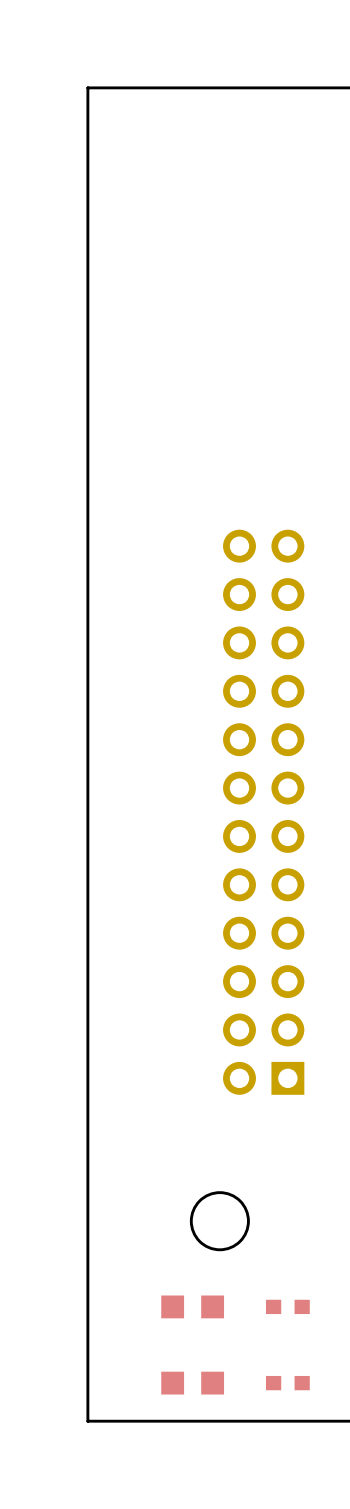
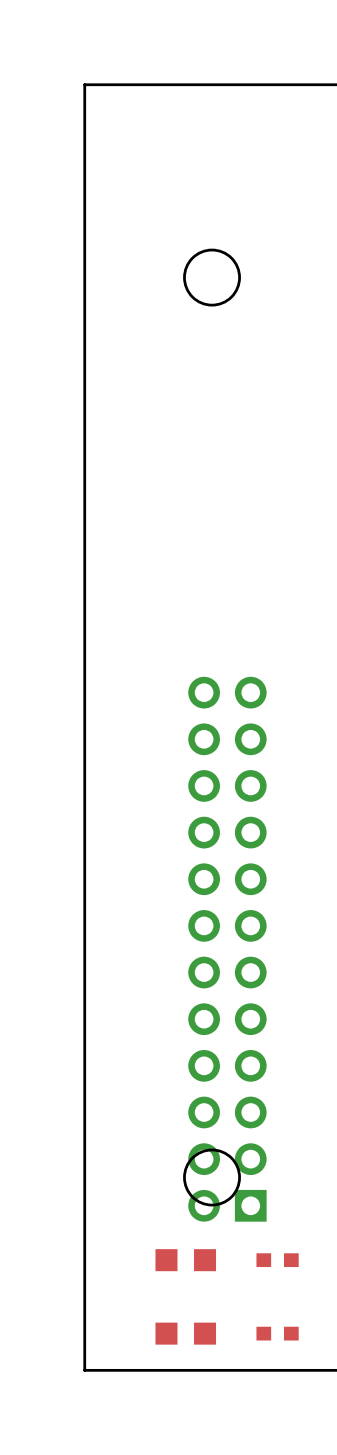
round board edge: none -> [183, 248, 241, 307]
part position: (263, 812) -> (227, 949)

